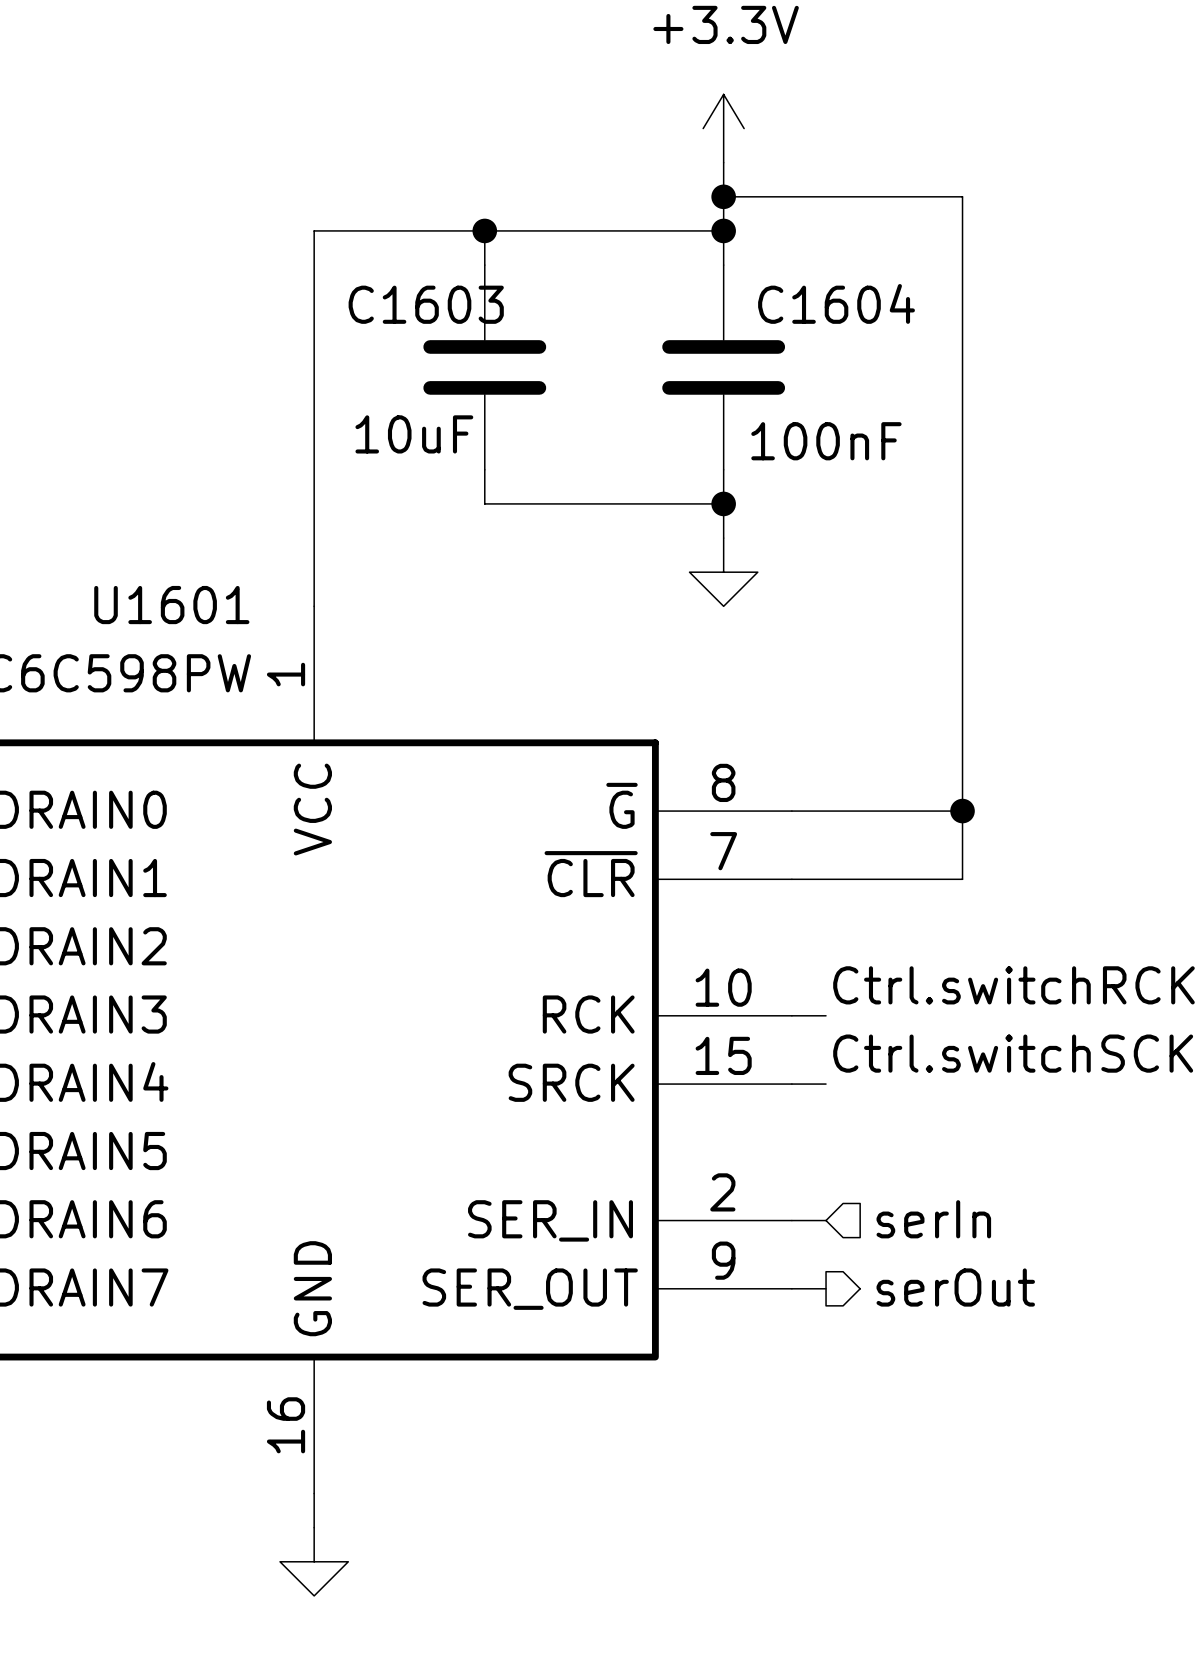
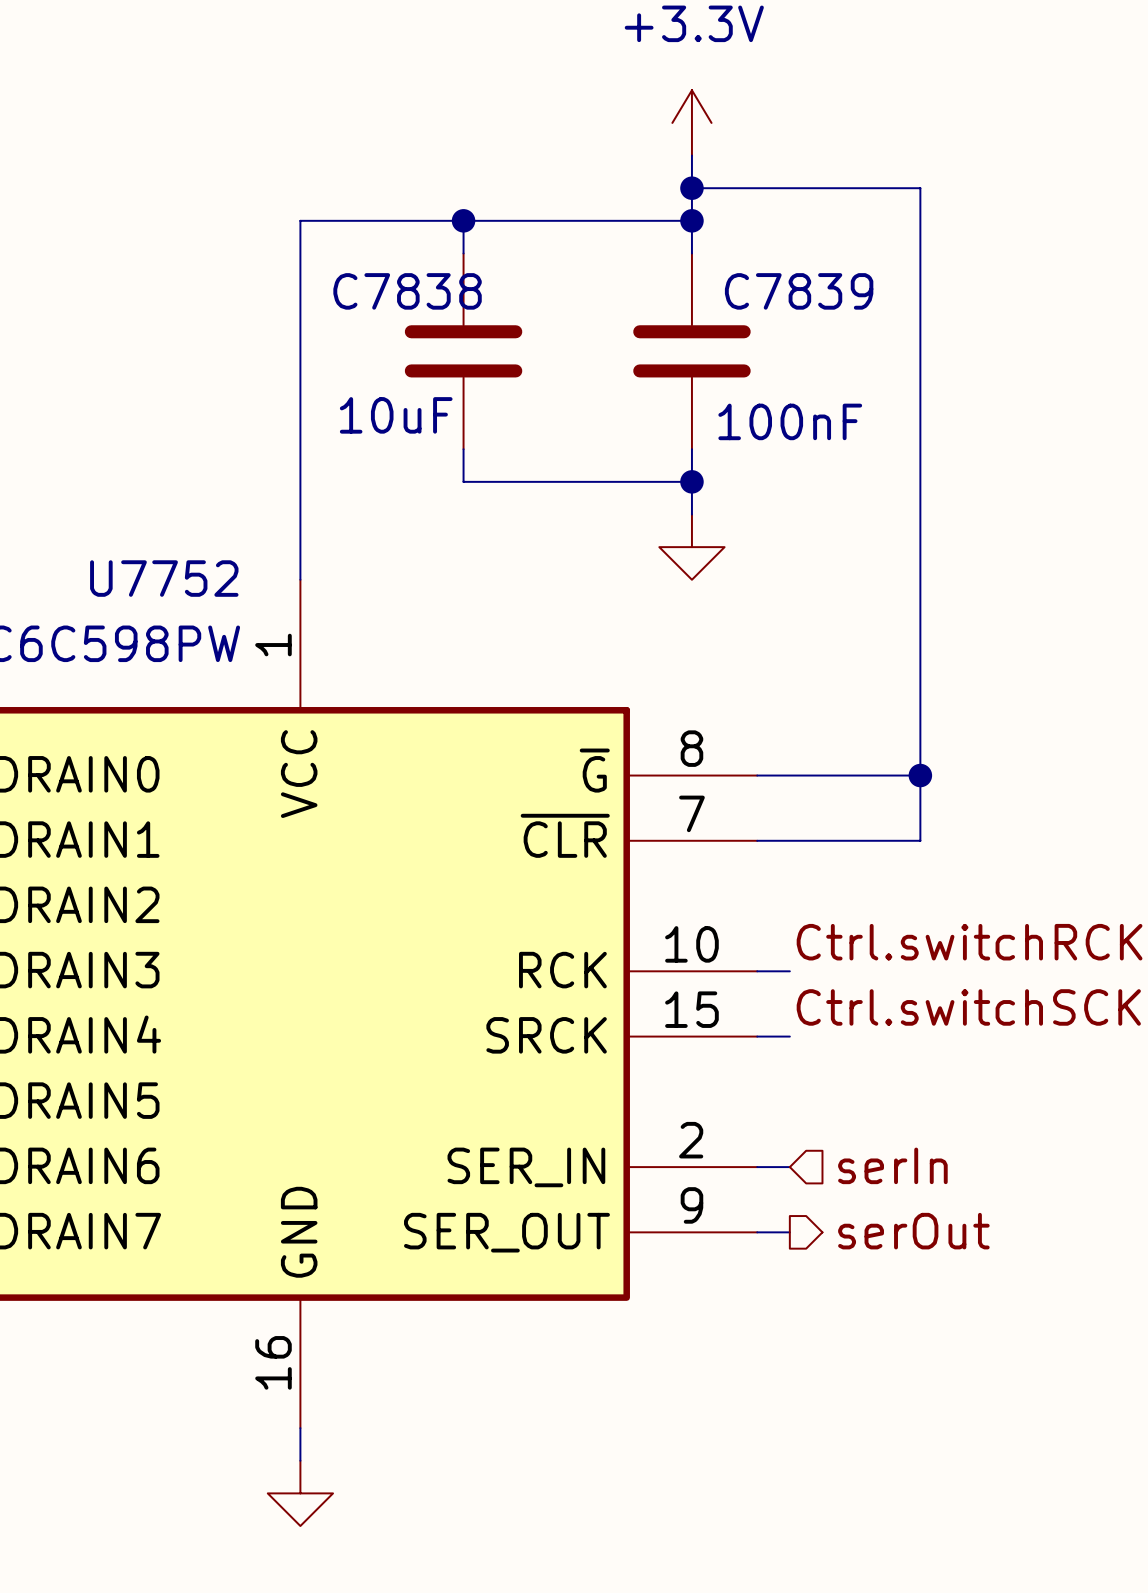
C1604 name: C1604 (836, 303) -> C7839 (799, 291)
C1603 name: C1603 (426, 304) -> C7838 (407, 291)
U1601 name: U1601 (171, 605) -> U7752 (164, 578)

